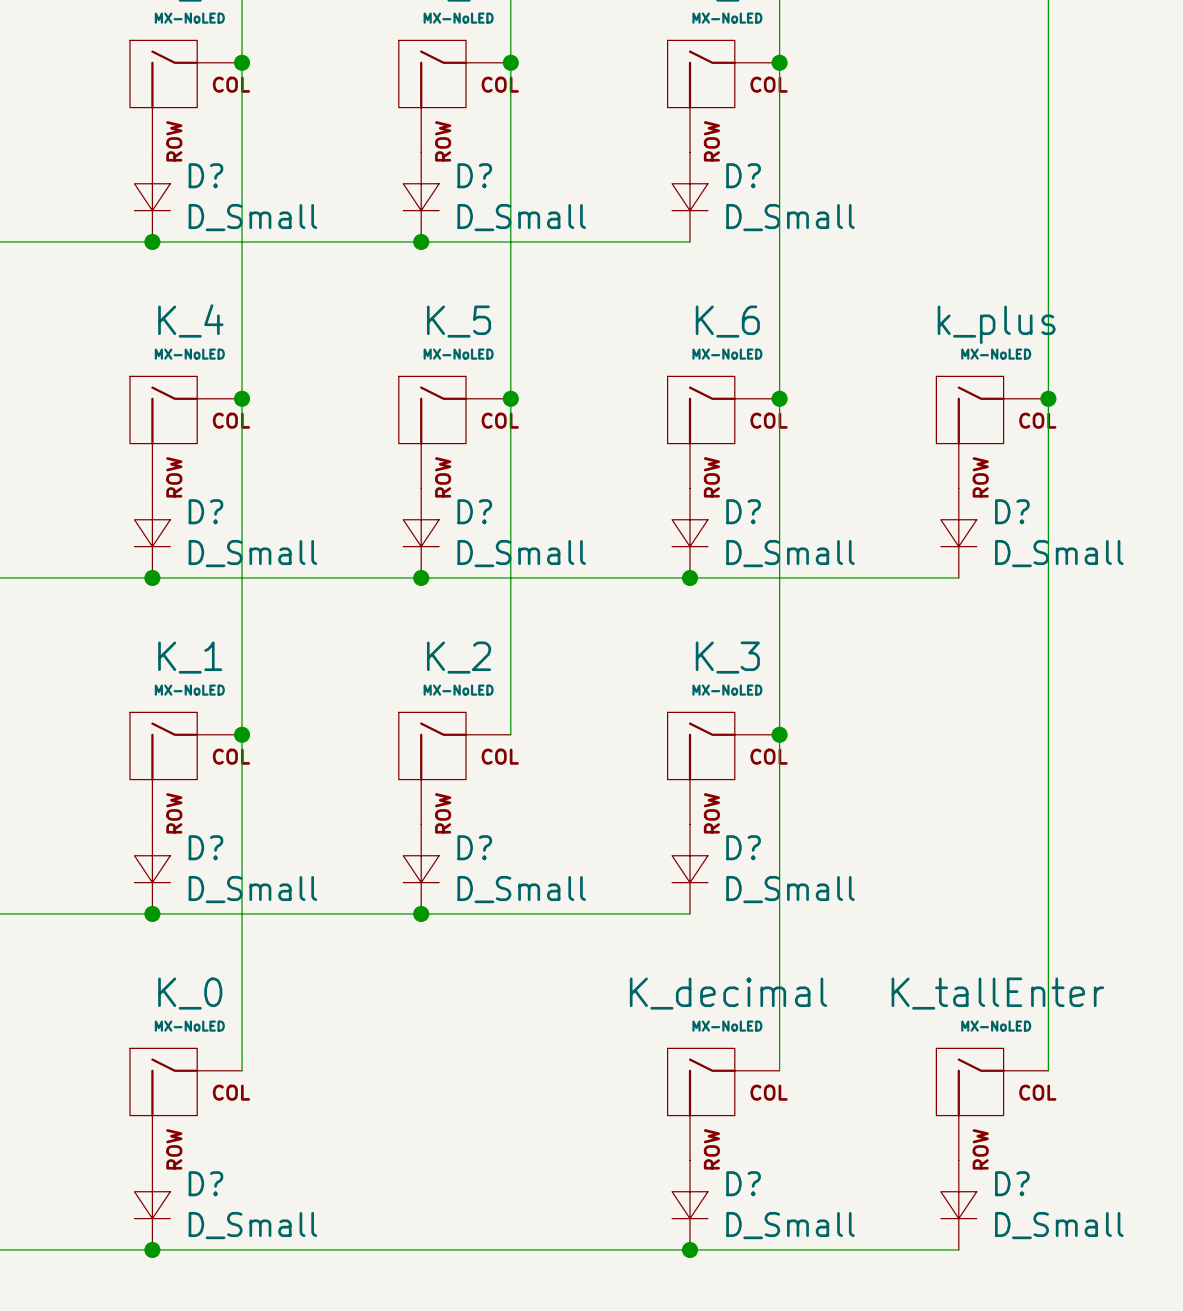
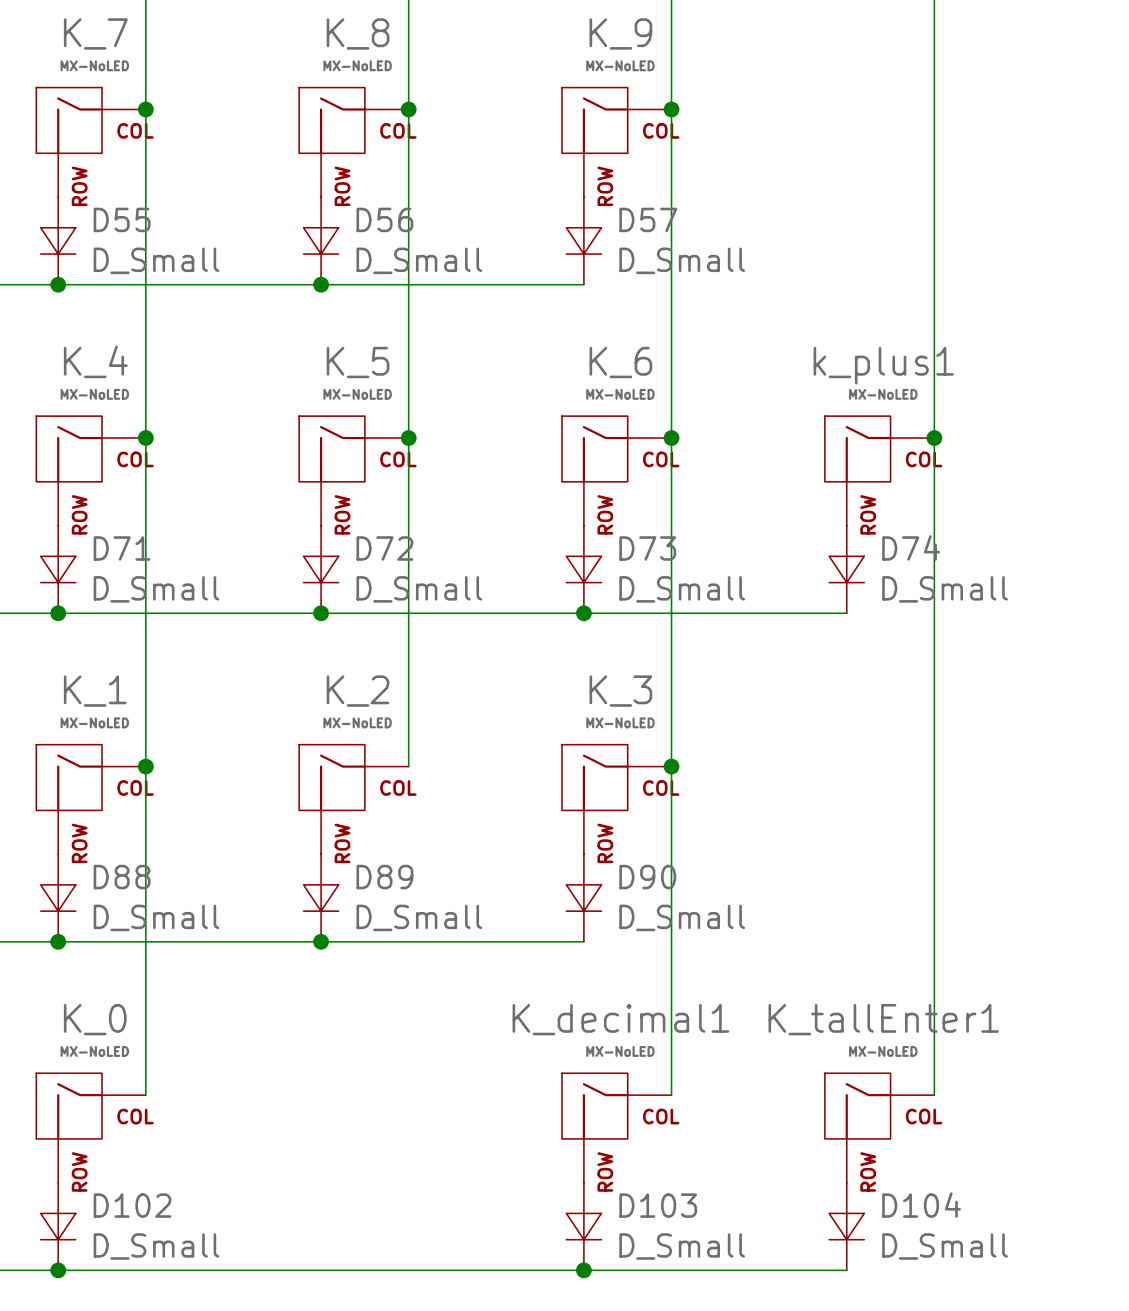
D? name: D? (205, 175) -> D55 (122, 219)
D? name: D? (474, 175) -> D56 (384, 219)
D? name: D? (743, 175) -> D57 (648, 219)
k_plus name: k_plus (996, 324) -> k_plus1 (883, 365)
D? name: D? (205, 511) -> D71 (122, 548)
D? name: D? (474, 511) -> D72 (384, 548)
D? name: D? (743, 511) -> D73 (647, 548)
D? name: D? (1012, 511) -> D74 (911, 547)
D? name: D? (205, 847) -> D88 (122, 877)
D? name: D? (474, 847) -> D89 (384, 877)
D? name: D? (743, 847) -> D90 (647, 877)
K_decimal name: K_decimal (728, 993) -> K_decimal1 (620, 1019)
K_tallEnter name: K_tallEnter (997, 993) -> K_tallEnter1 (883, 1019)
D? name: D? (205, 1183) -> D102 (132, 1205)
D? name: D? (743, 1183) -> D103 (658, 1205)
D? name: D? (1012, 1183) -> D104 (921, 1205)

